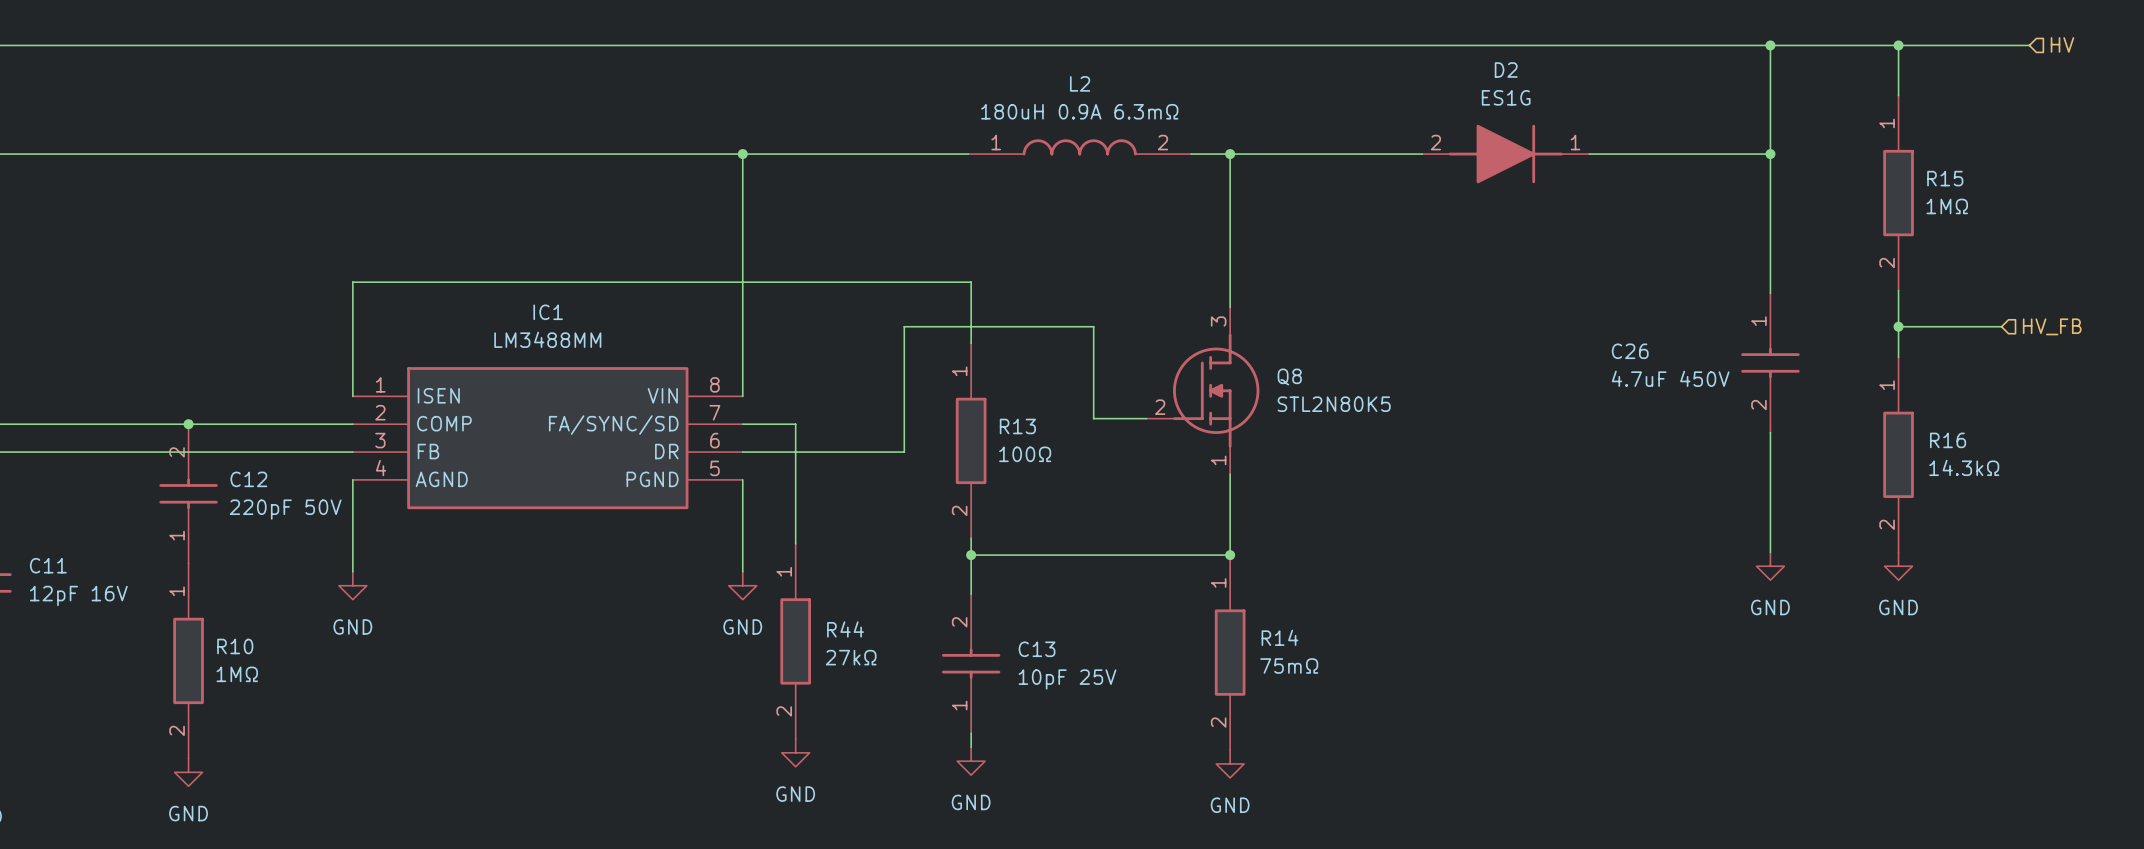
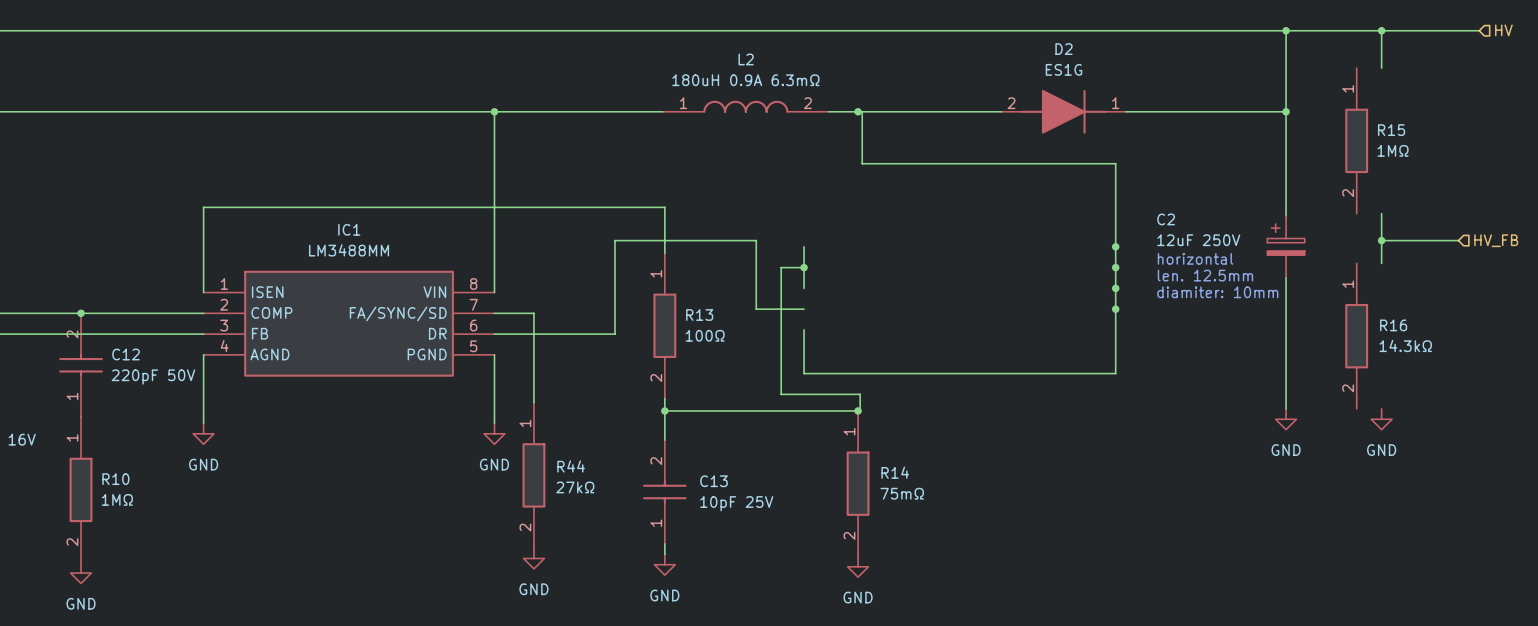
hierarchical label position: HV (2062, 44) -> HV (1503, 30)
wire: (1770, 45) (1770, 293) -> (1286, 30) (1286, 215)
junction position: (1770, 45) -> (1286, 30)
wire: (1898, 45) (1898, 95) -> (1381, 30) (1381, 68)
junction position: (1898, 45) -> (1381, 30)
wire: none -> (1454, 30) (1479, 30)
wire: (1230, 154) (1230, 307) -> none
wire: none -> (862, 111) (862, 163) (1115, 163) (1115, 373) (804, 373) (804, 329)
wire: none -> (1261, 111) (1286, 111)
junction position: (1770, 154) -> (1286, 111)
wire: (1898, 290) (1898, 357) -> (1381, 213) (1381, 263)
wire: (1898, 326) (1931, 326) -> (1433, 240) (1458, 240)
junction position: (1898, 326) -> (1381, 240)
hierarchical label position: HV_FB (2052, 326) -> HV_FB (1496, 240)
wire: none -> (804, 246) (804, 288)
junction: none -> (1115, 246)
C2: none -> 12uF 250V (1286, 246)
text: none -> horizontal (1195, 258)
junction: none -> (804, 267)
junction: none -> (1115, 267)
C26: 4.7uF 450V (1770, 362) -> none
text: none -> len. 12.5mm (1205, 275)
wire: none -> (1286, 278) (1286, 408)
Q8: STL2N80K5 (1202, 390) -> none
junction: none -> (1115, 288)
text: none -> diamiter: 10mm (1217, 292)
junction: none -> (1115, 309)
wire: (1770, 432) (1770, 552) -> none
wire: (1230, 474) (1230, 555) -> (804, 267) (781, 267) (781, 394) (860, 394) (860, 410) (858, 410)
power symbol position: GND (1770, 566) -> GND (1286, 419)
power symbol position: GND (1898, 566) -> GND (1381, 419)

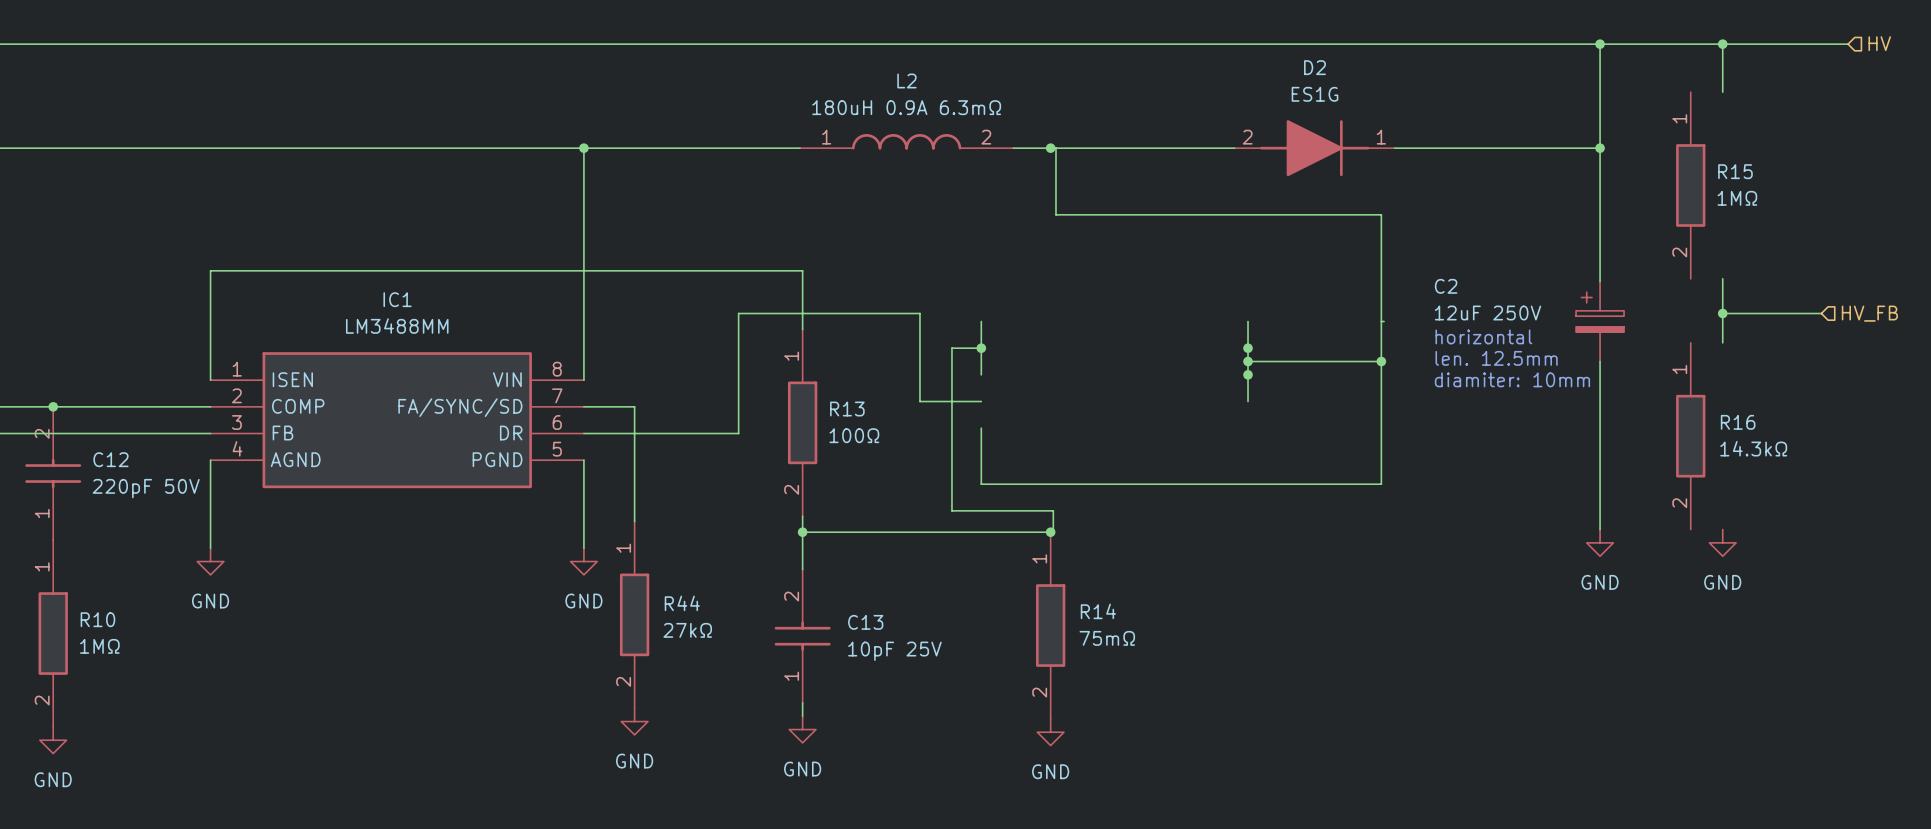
wire: none -> (1248, 321) (1248, 401)
junction: (1115, 246) -> none
junction: none -> (1248, 348)
junction: (1115, 267) -> none
wire: none -> (1248, 361) (1381, 361)
junction: none -> (1248, 361)
junction: none -> (1381, 361)
junction: none -> (1248, 374)
junction: (1115, 288) -> none
junction: (1115, 309) -> none

